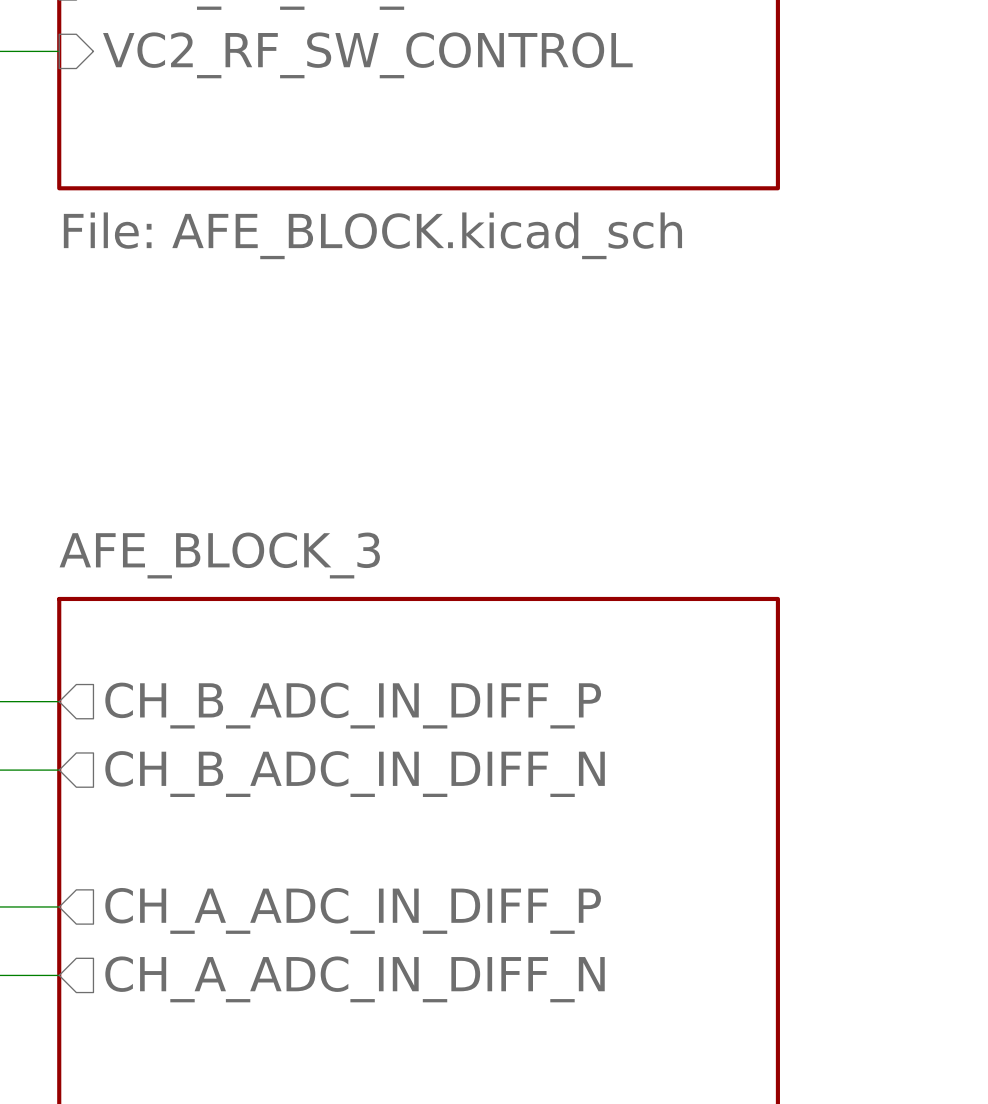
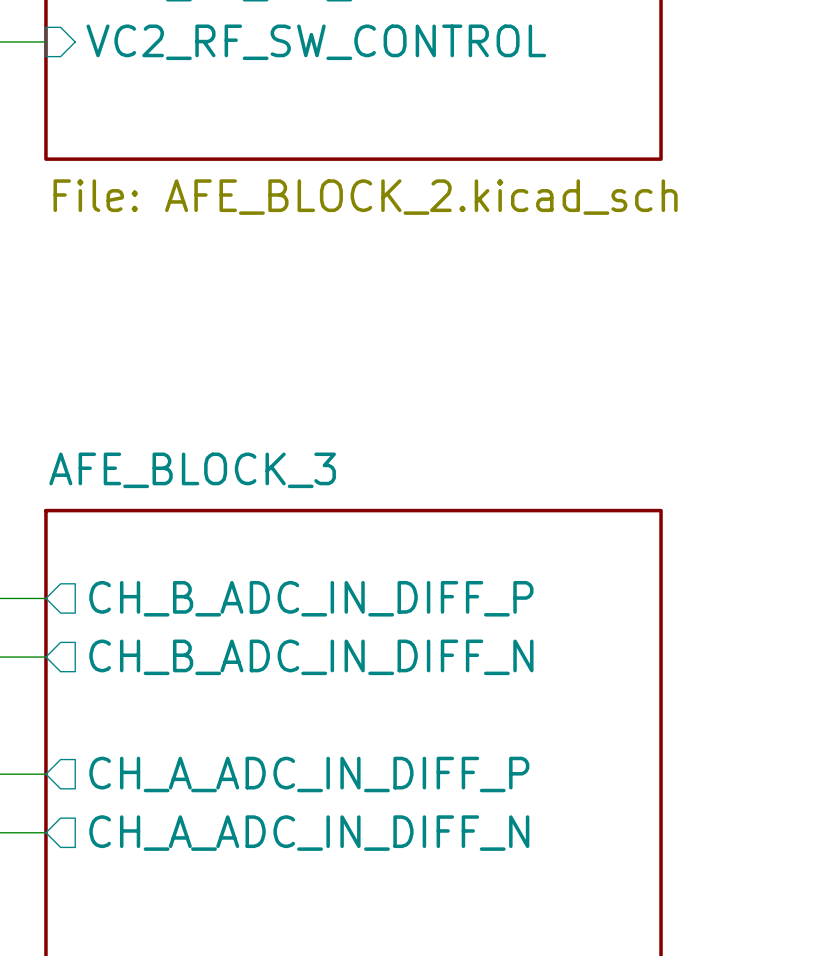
sheet value: File: AFE_BLOCK.kicad_sch (372, 235) -> File: AFE_BLOCK_2.kicad_sch (365, 197)

